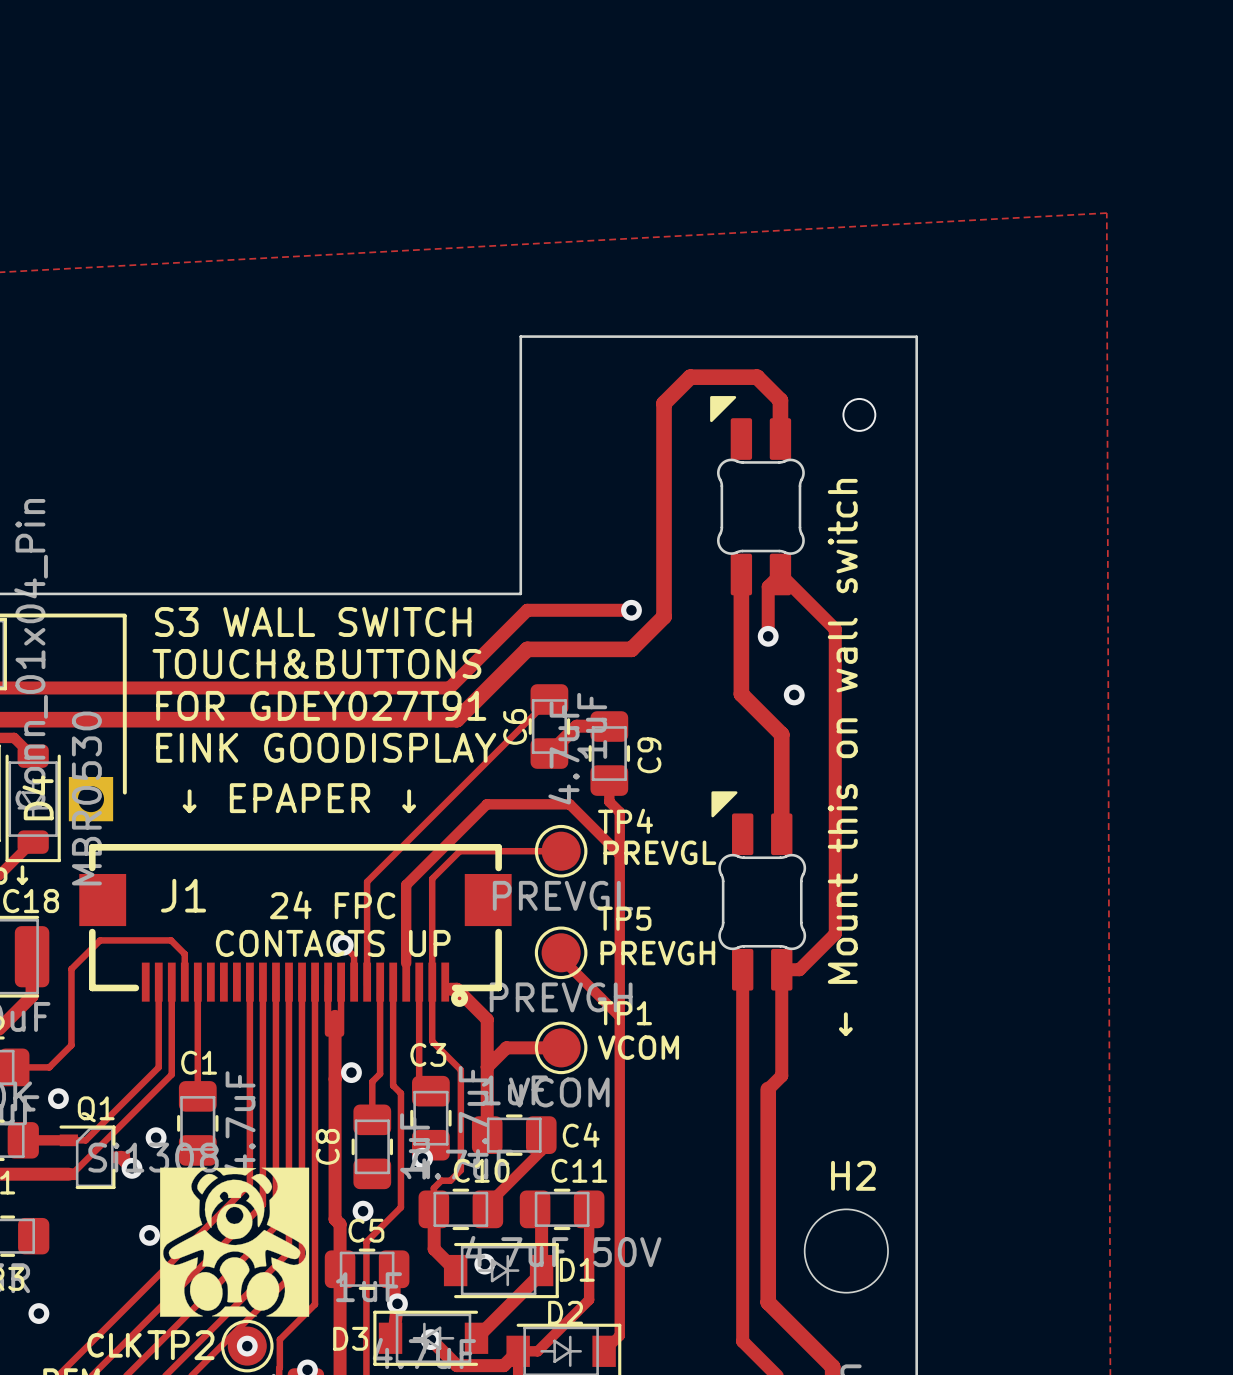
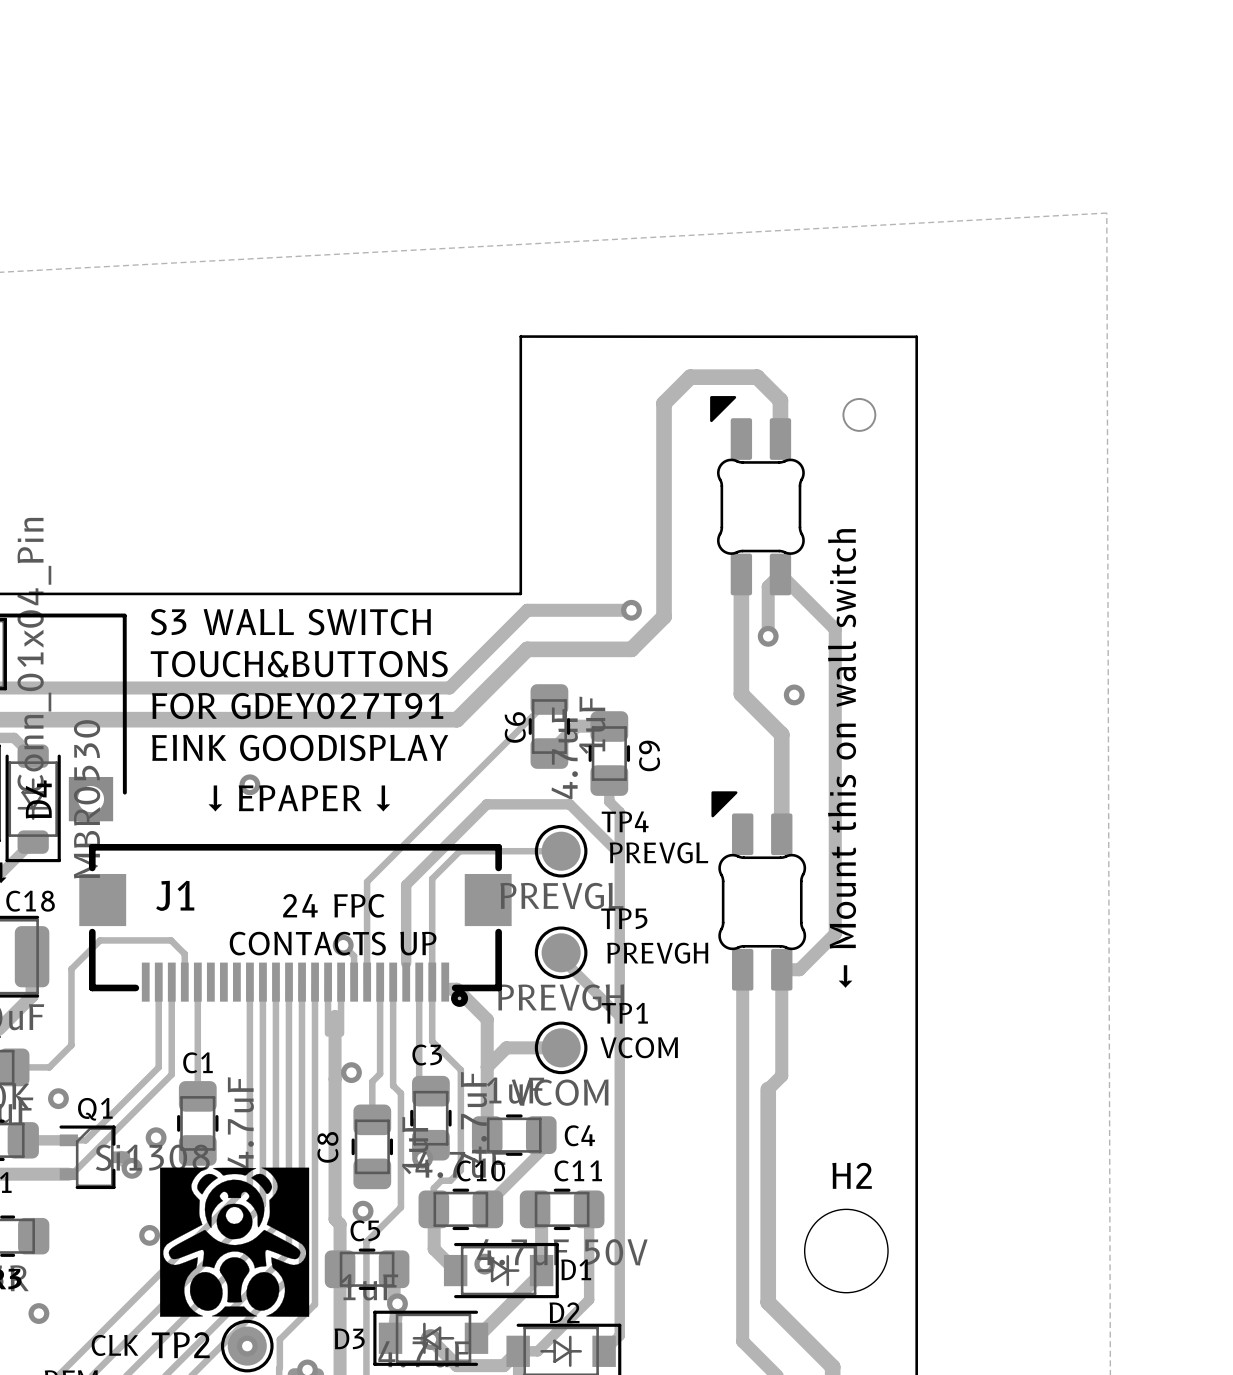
via: none -> (249, 784)

